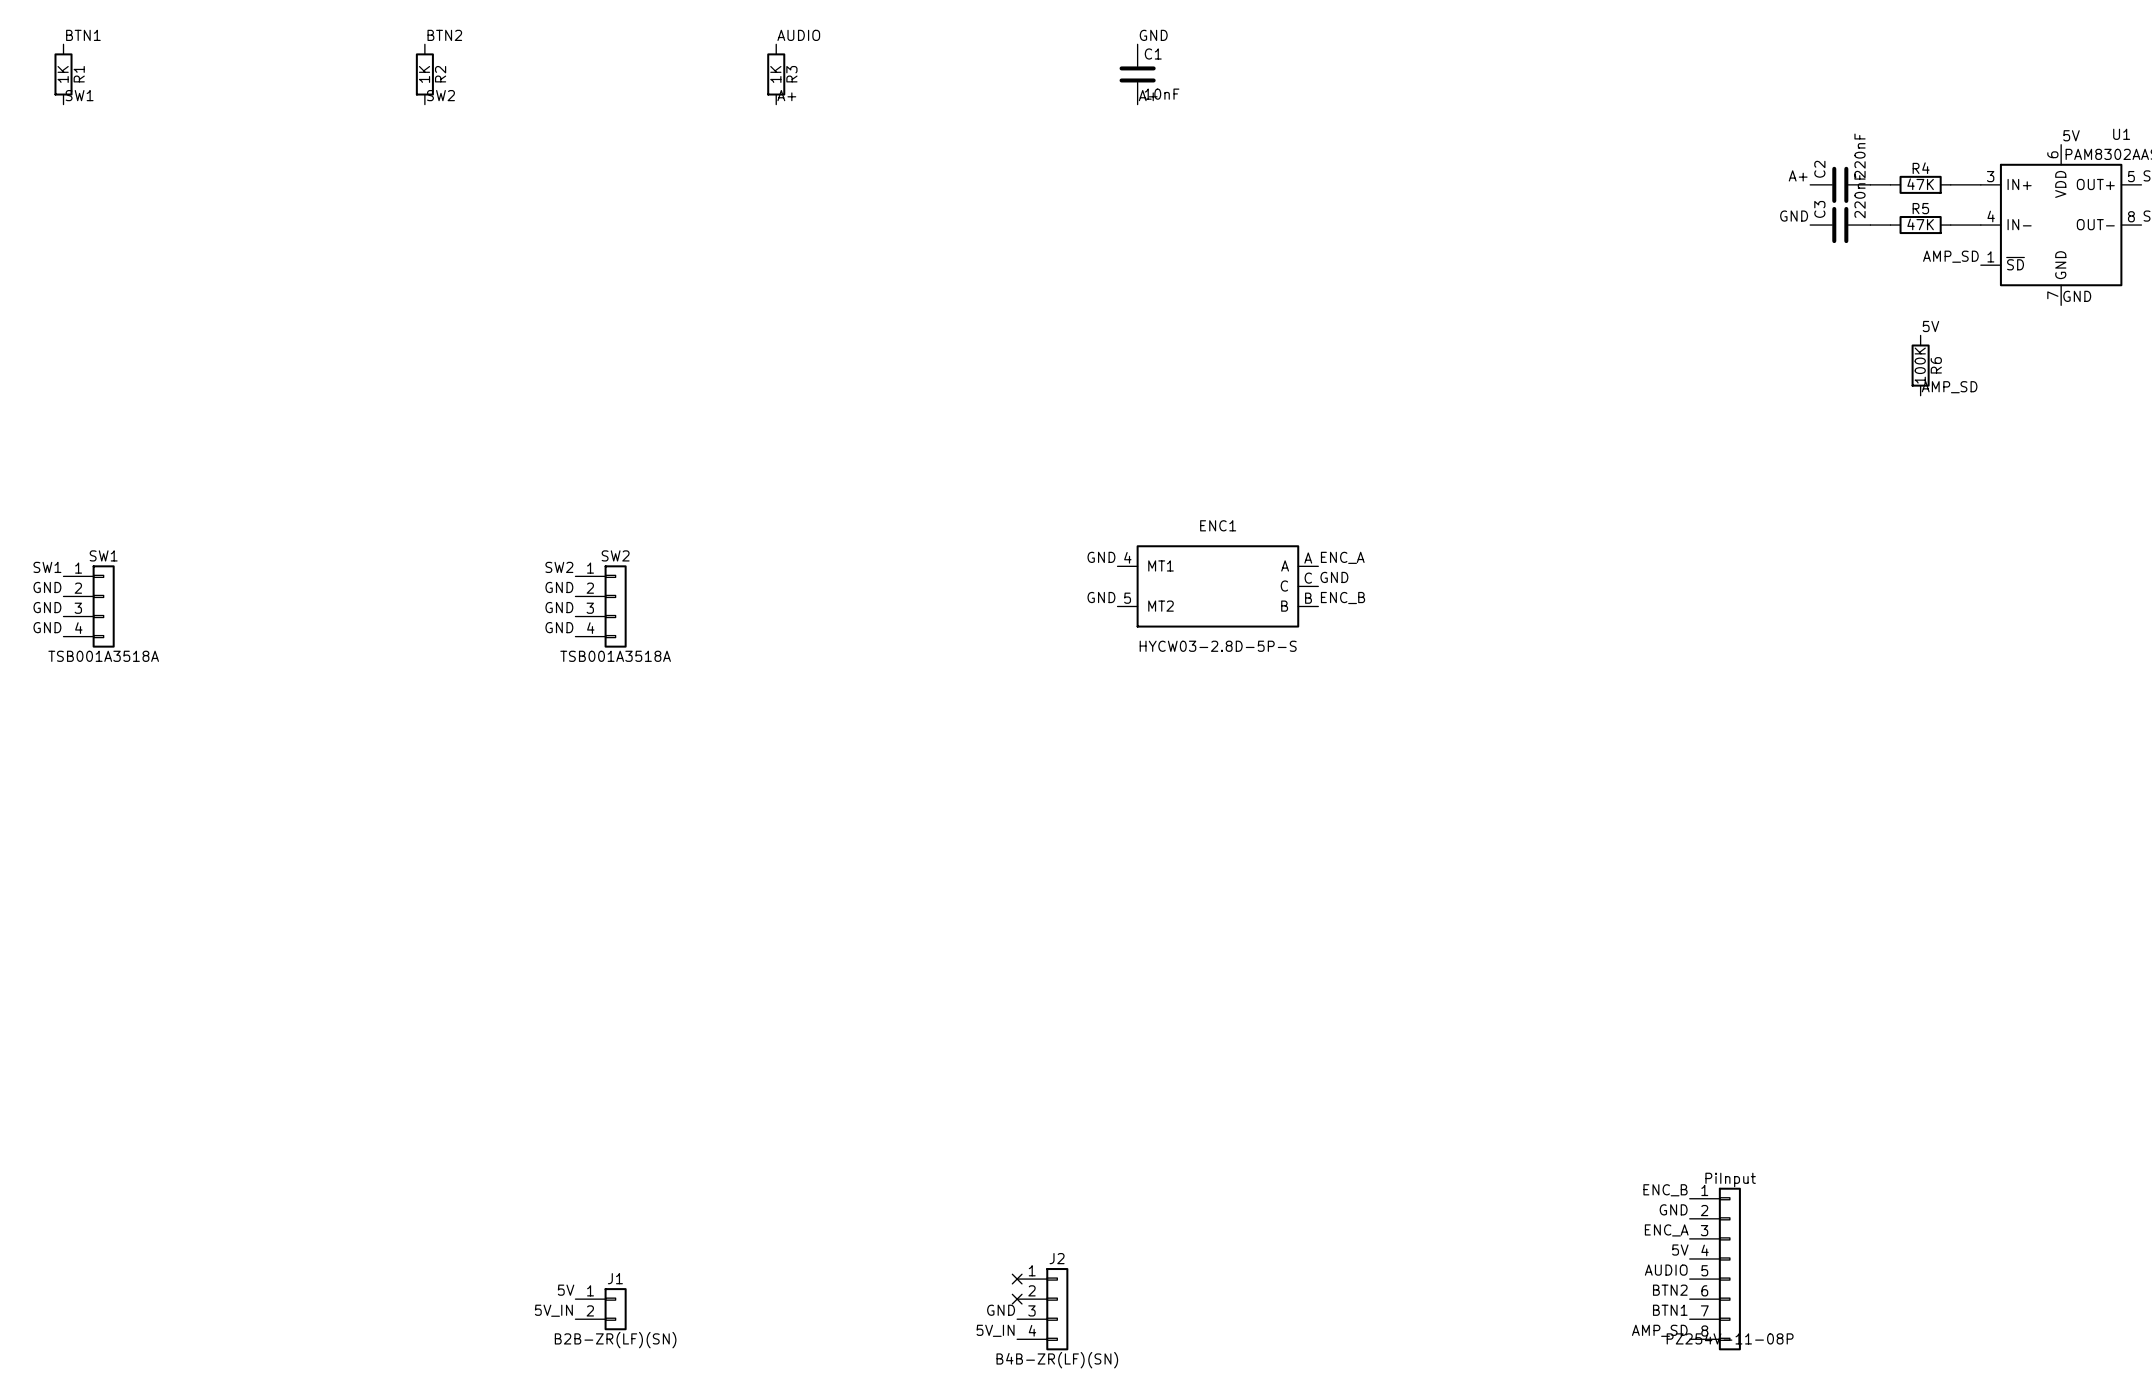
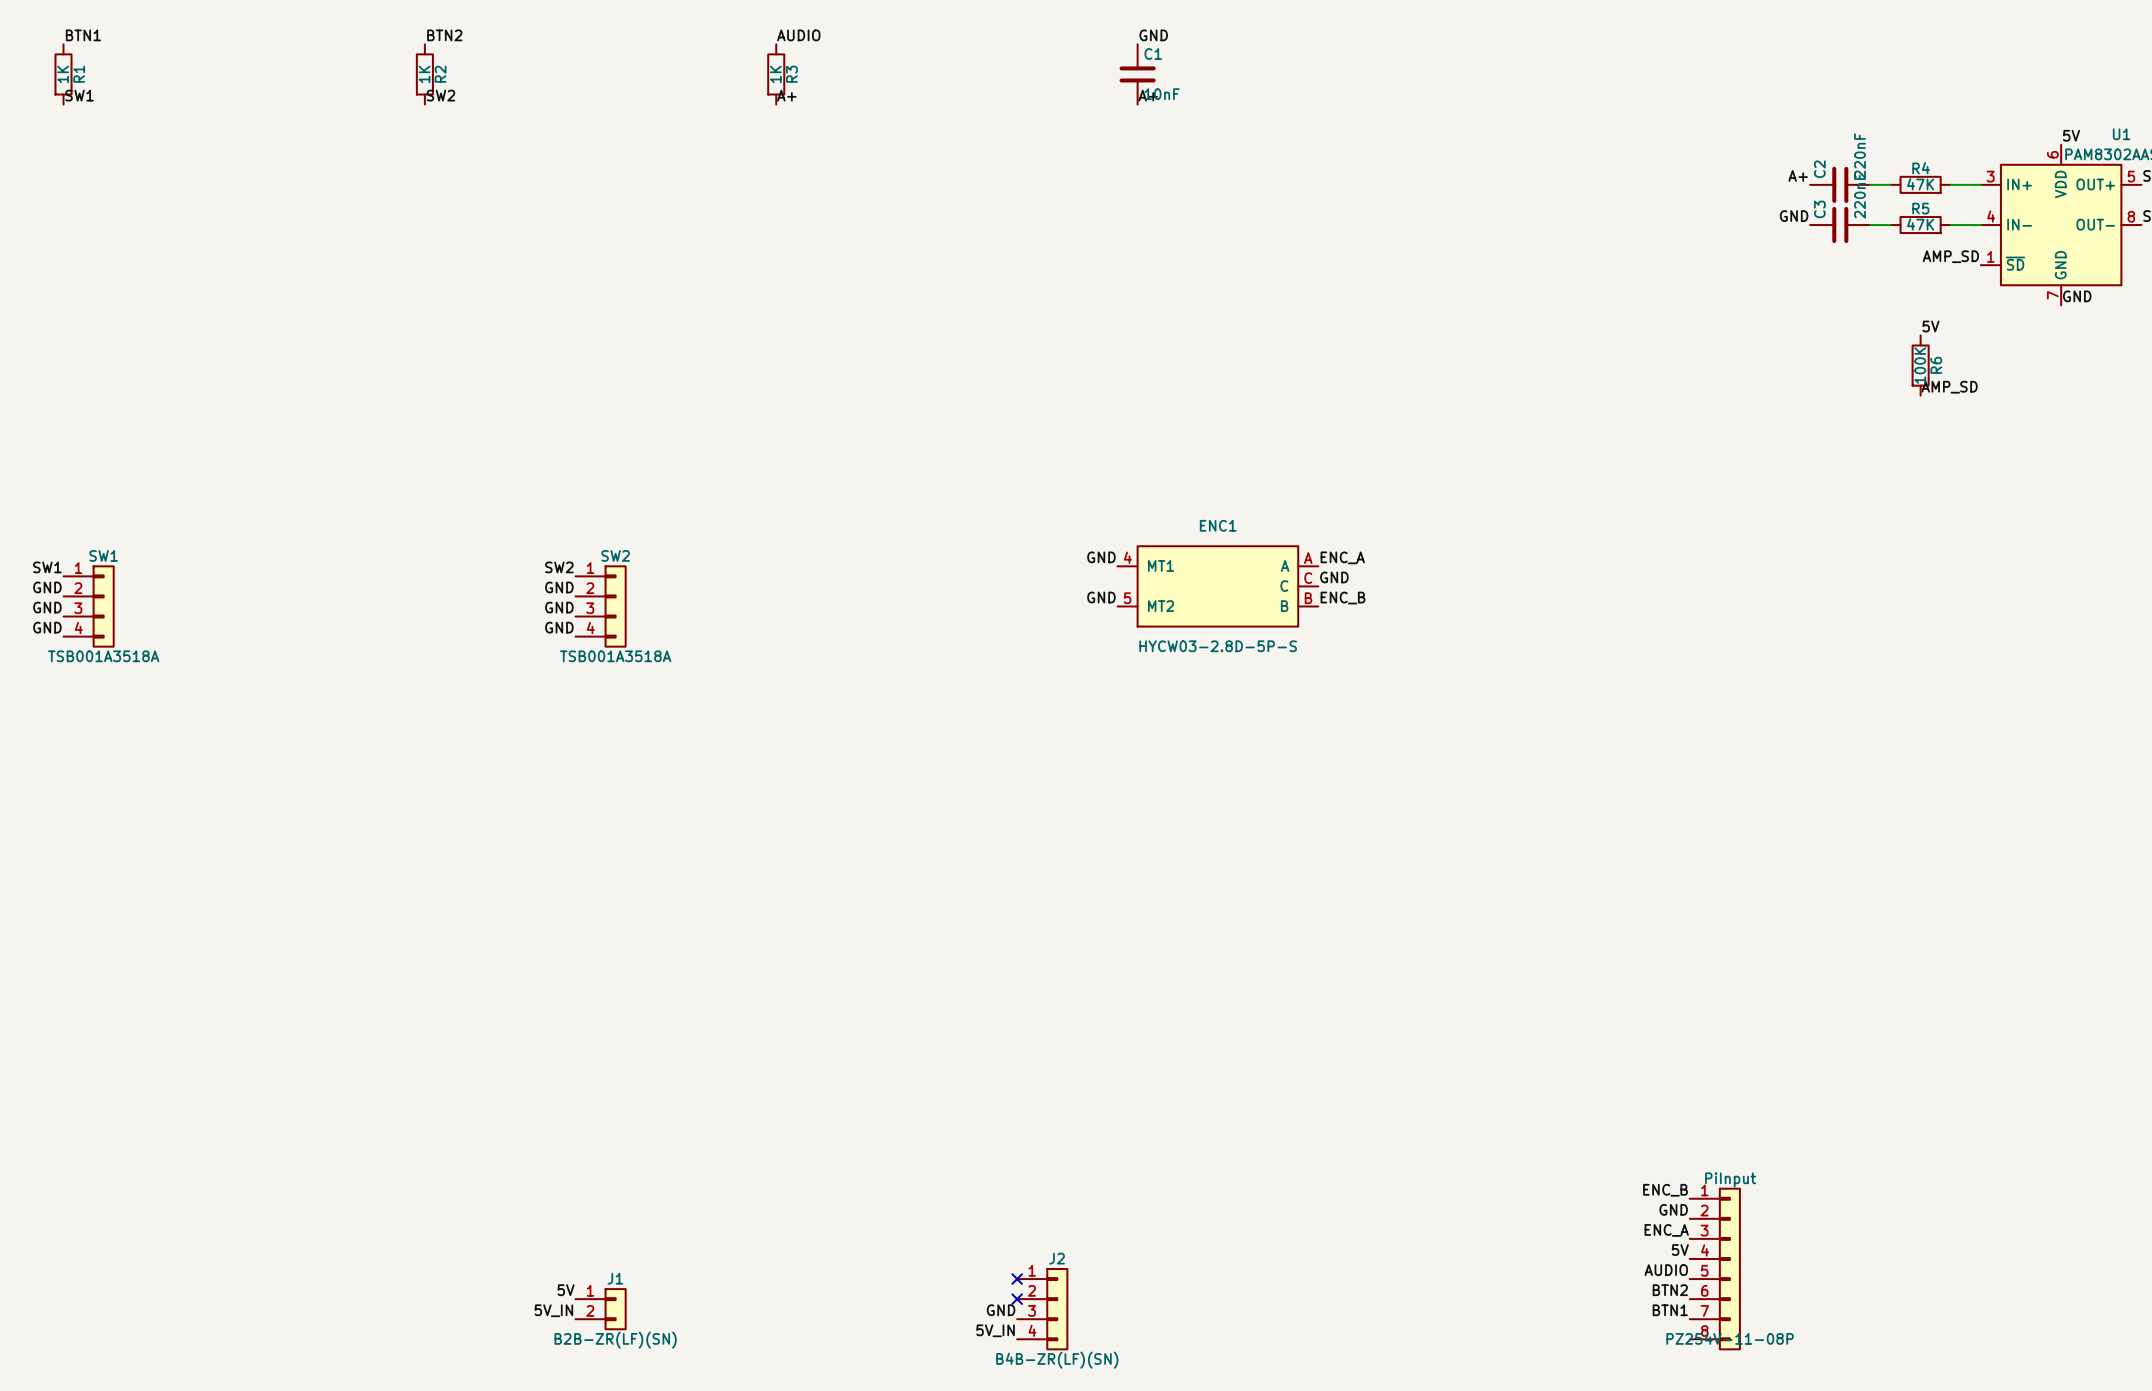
label: AMP_SD (1659, 1330) -> none

